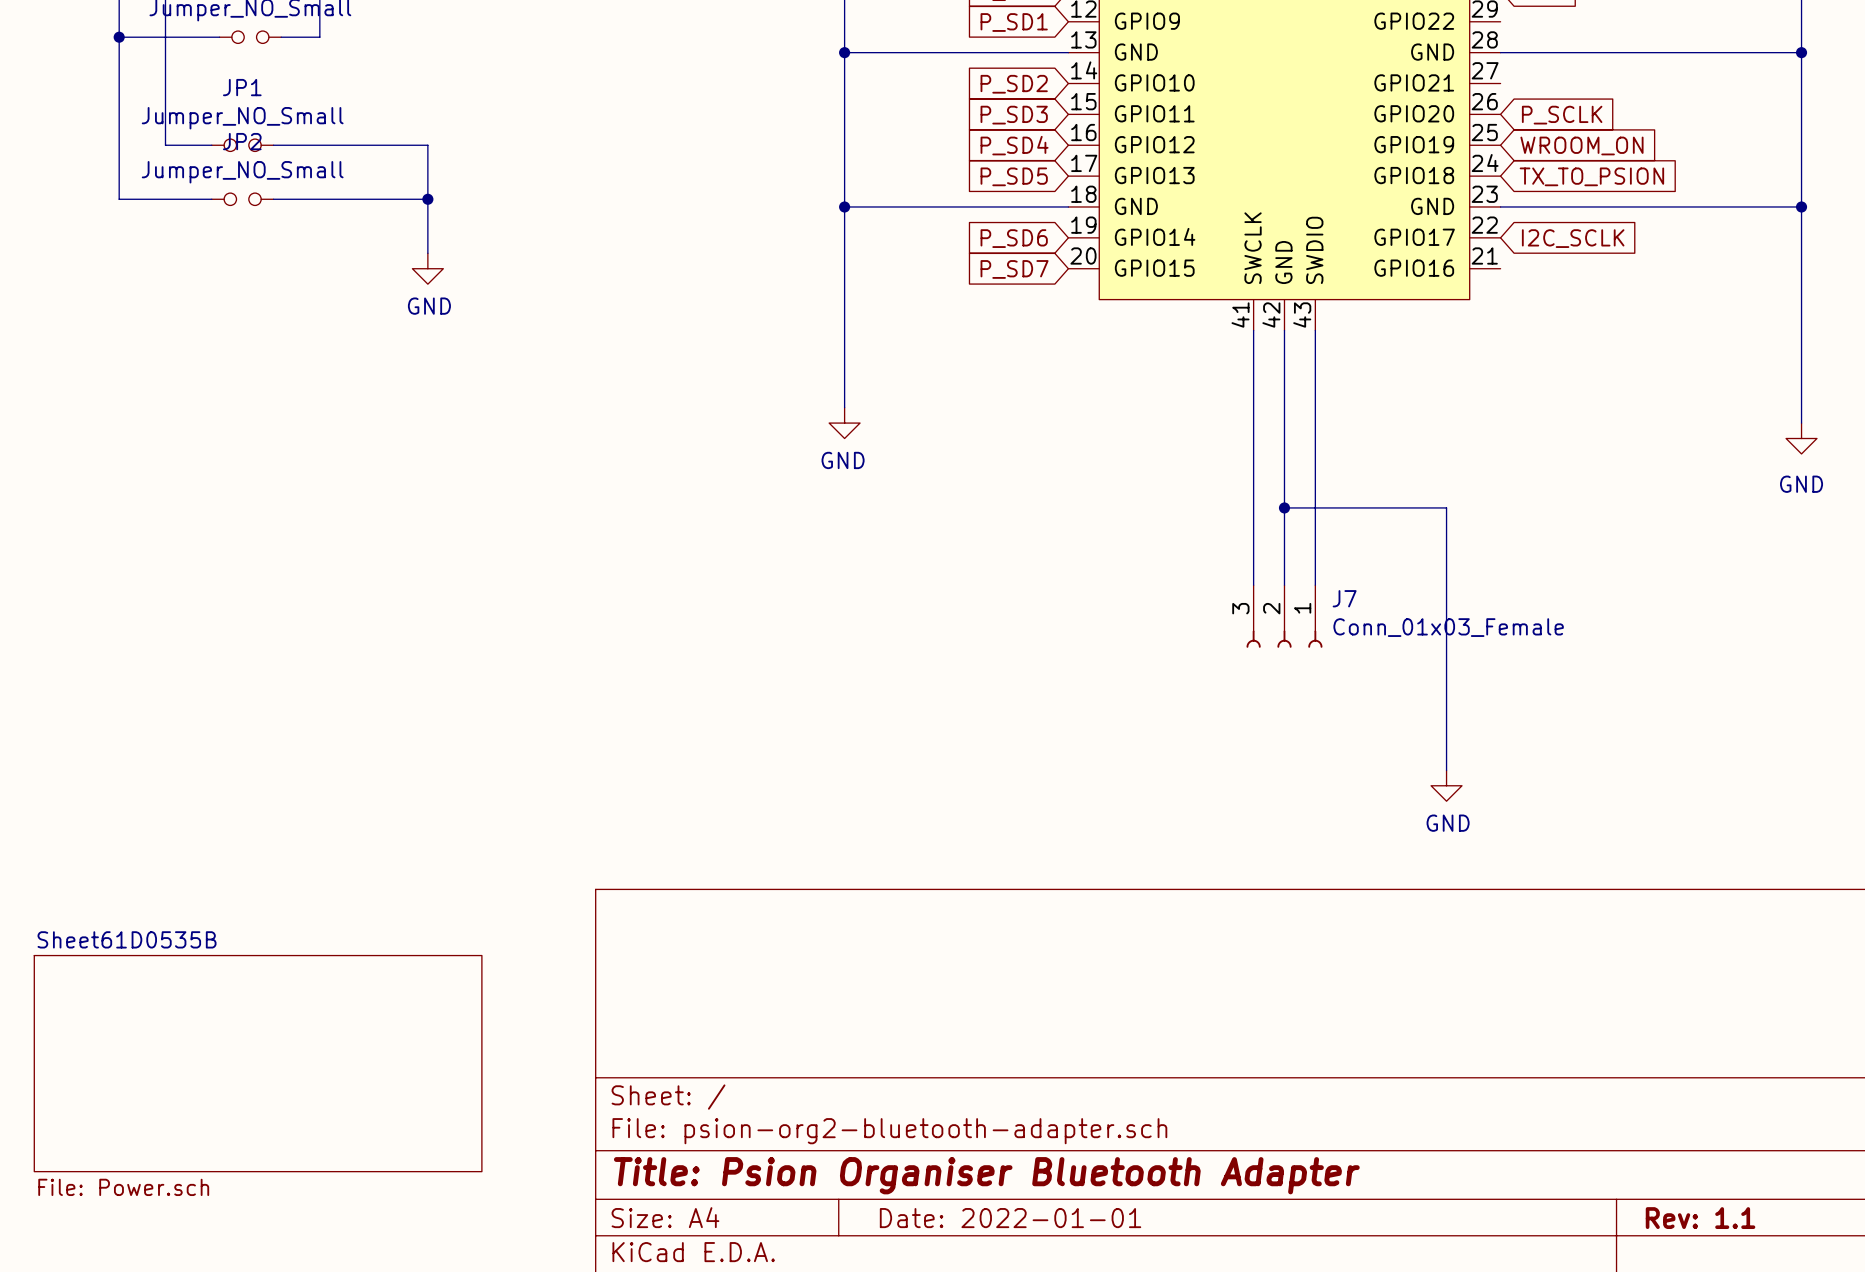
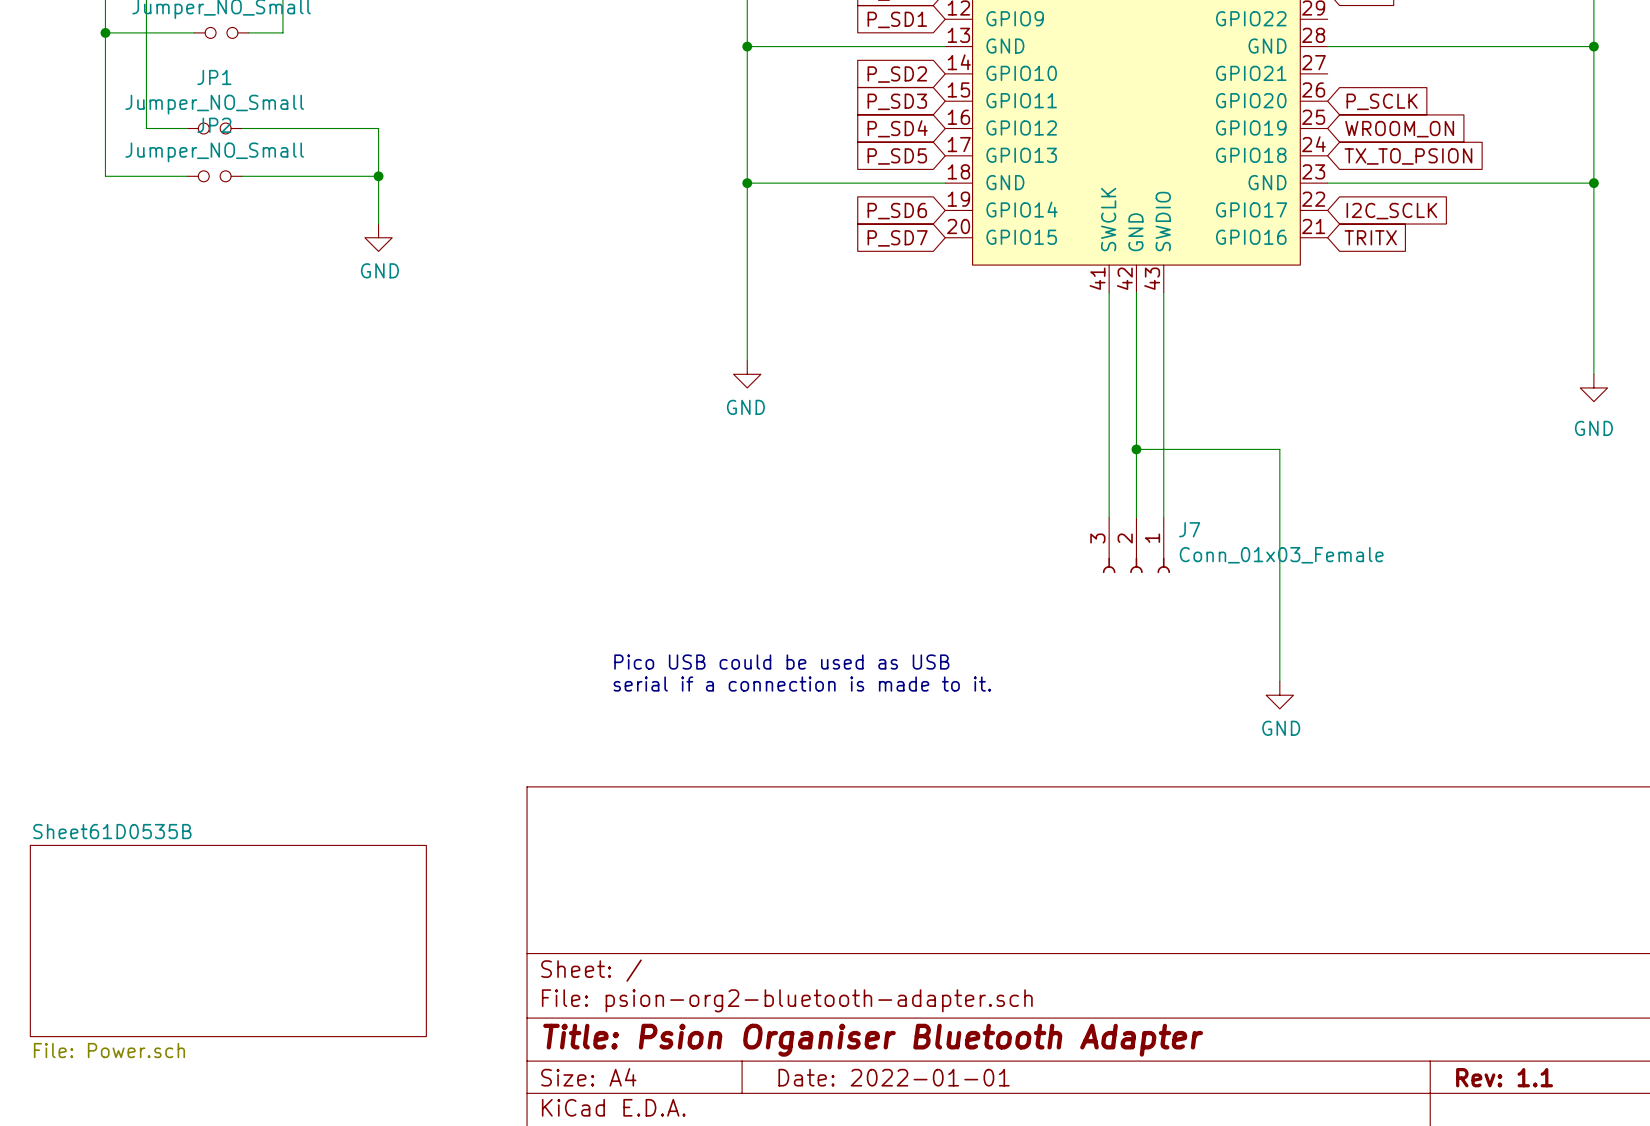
global label: none -> TRITX (1370, 237)
text: none -> Pico USB could be used as USB (781, 662)
text: none -> serial if a connection is made to it. (802, 684)

